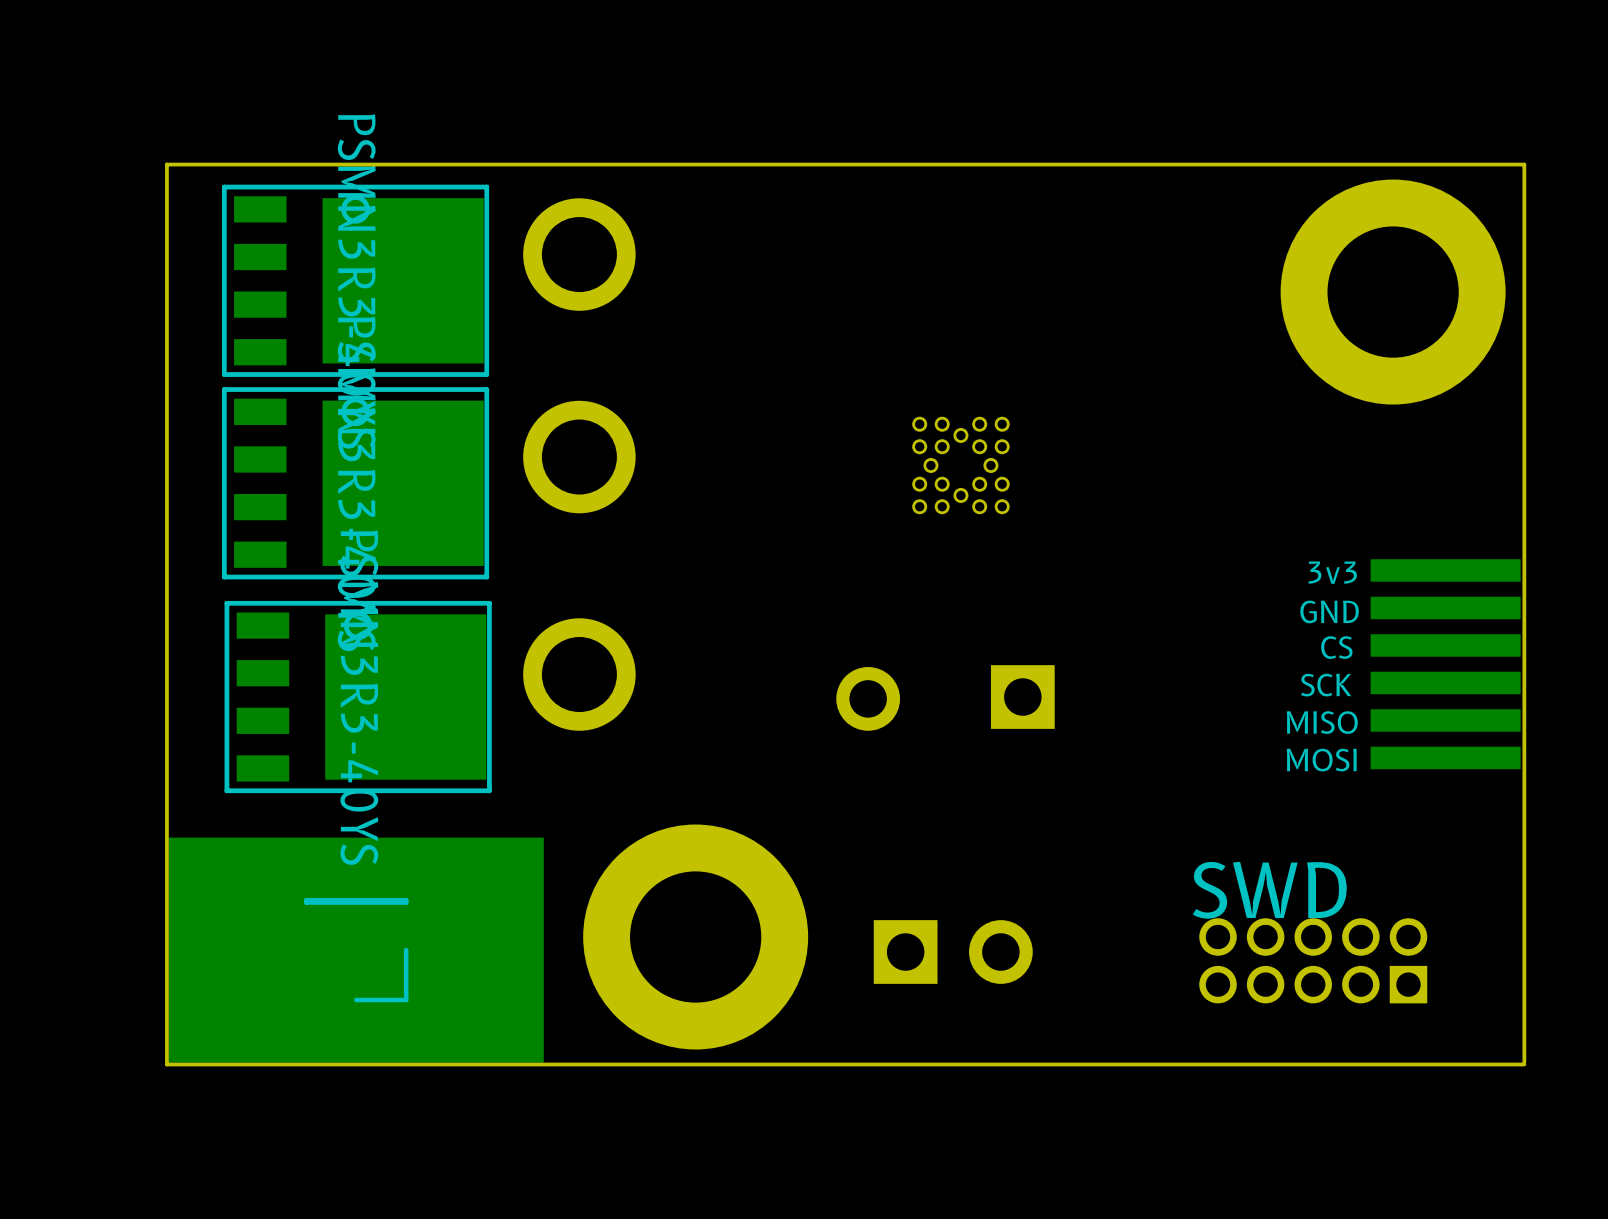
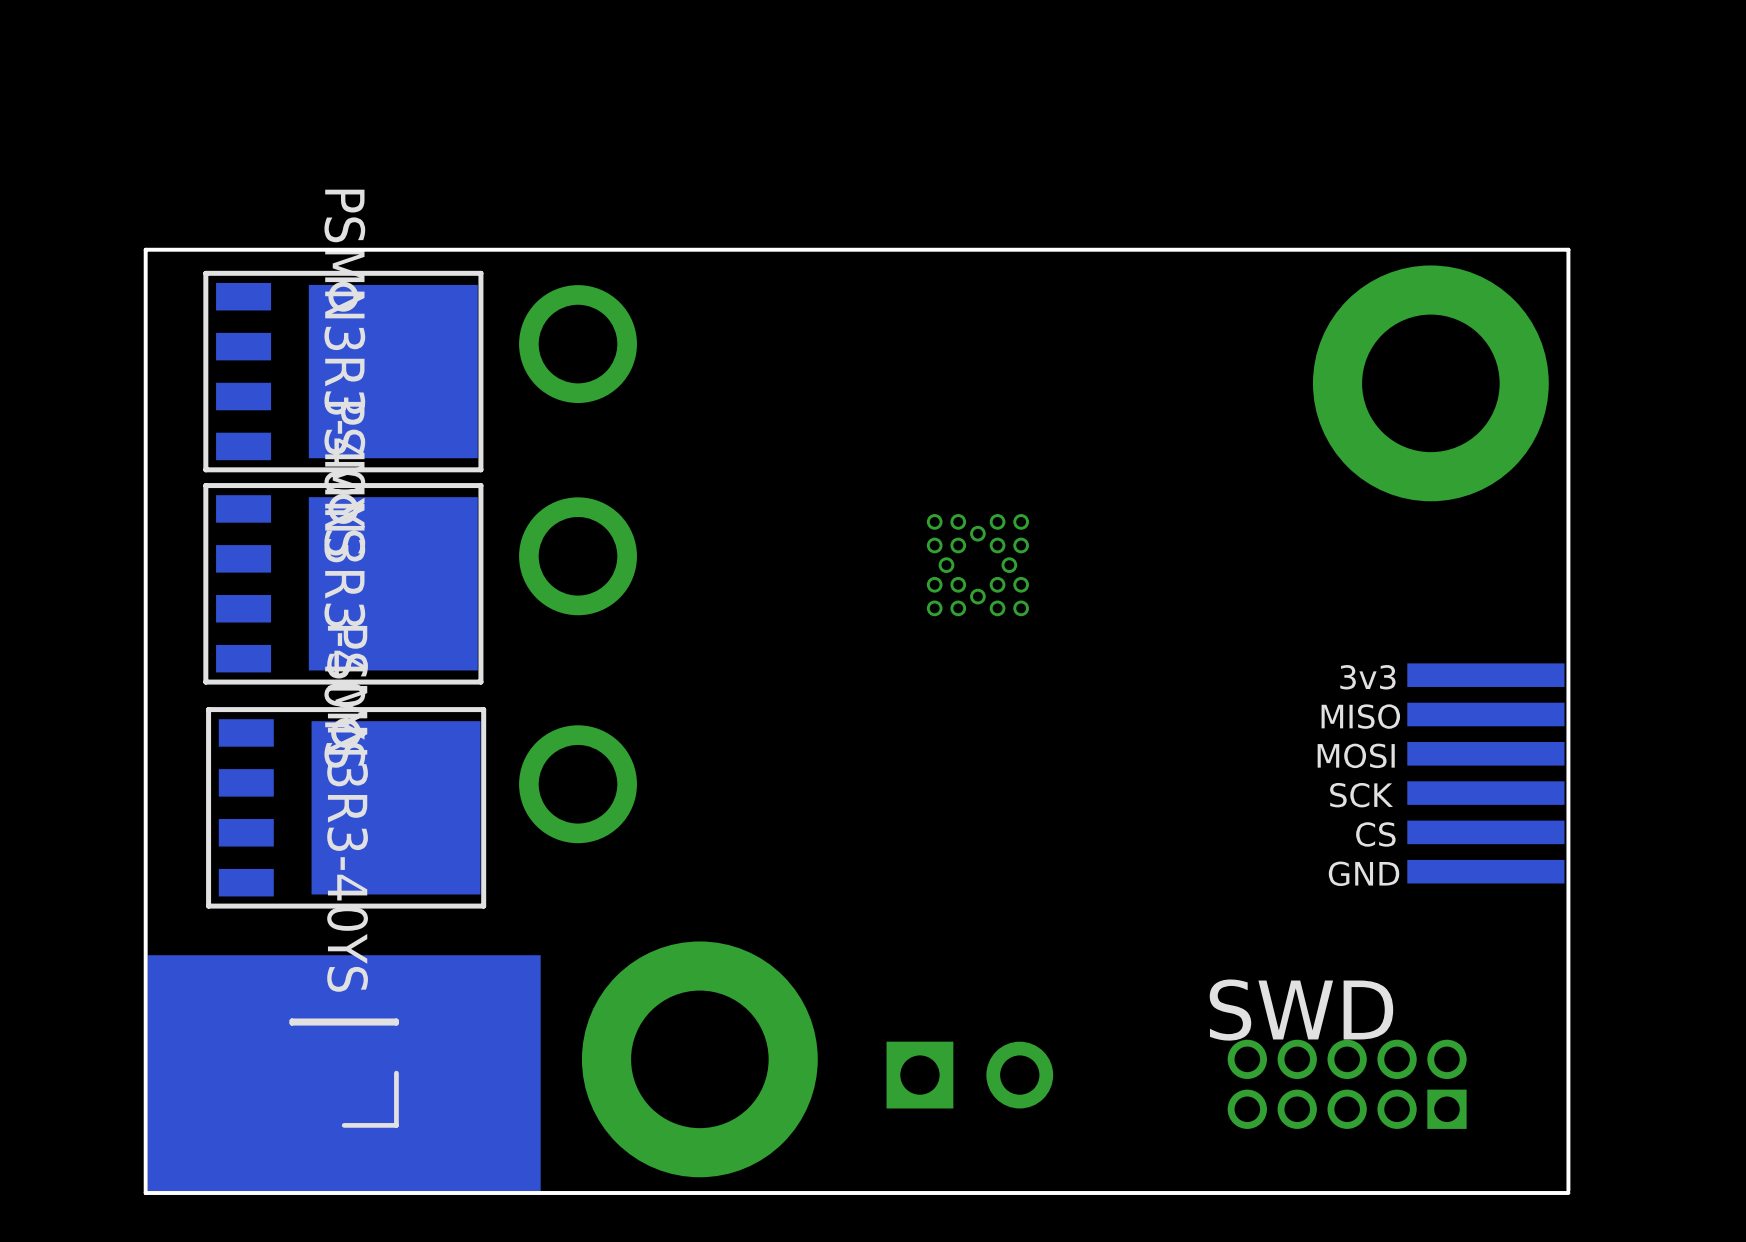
text: GND (1329, 611) -> MISO (1360, 716)
text: CS (1336, 647) -> MOSI (1356, 755)
part: (1022, 697) -> none
part: (868, 698) -> none
text: MISO (1322, 722) -> none
text: none -> CS (1375, 834)
text: MOSI (1321, 760) -> GND (1364, 873)

